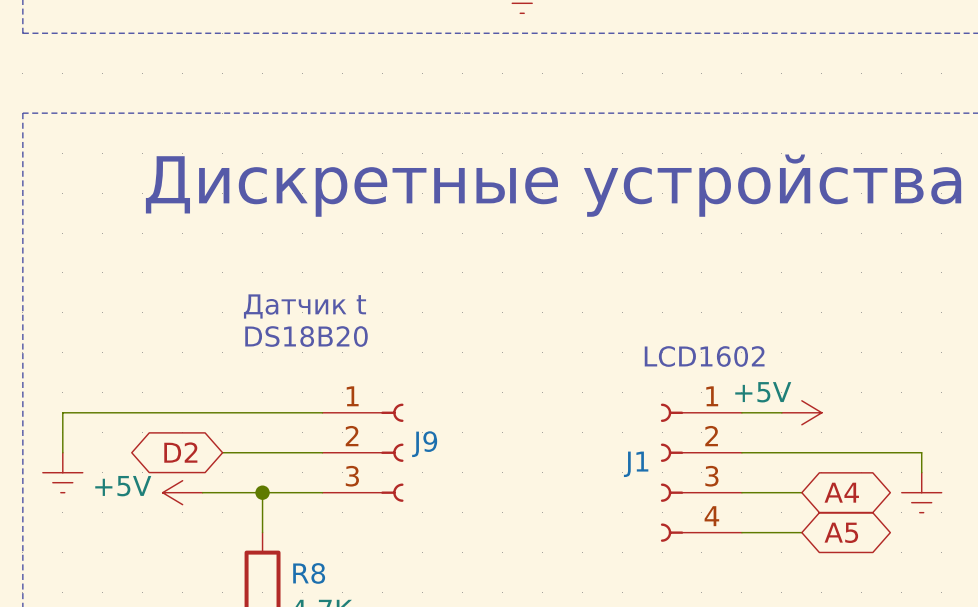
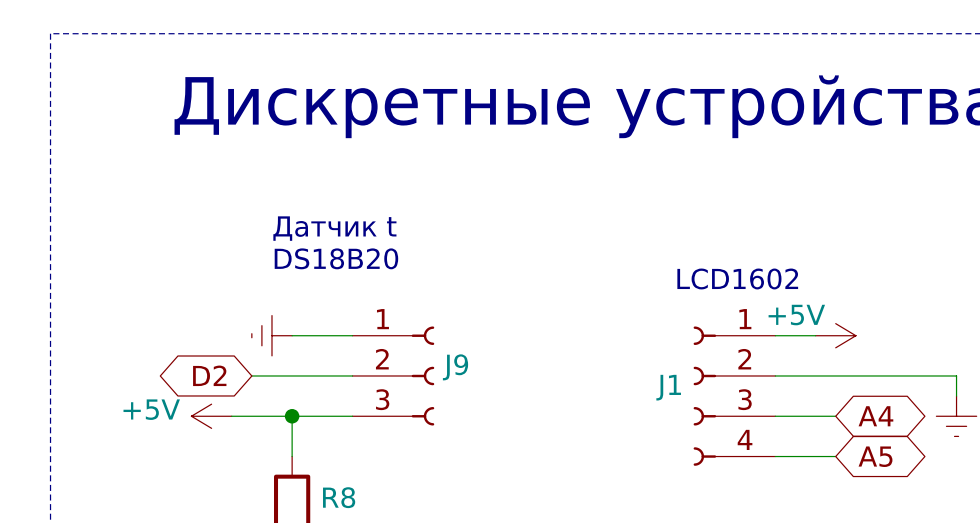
wire: (262, 412) (62, 412) (62, 452) -> none
power symbol rotation: 0° (62, 472) -> 90° clockwise (271, 335)
power symbol position: (62, 472) -> (271, 335)

